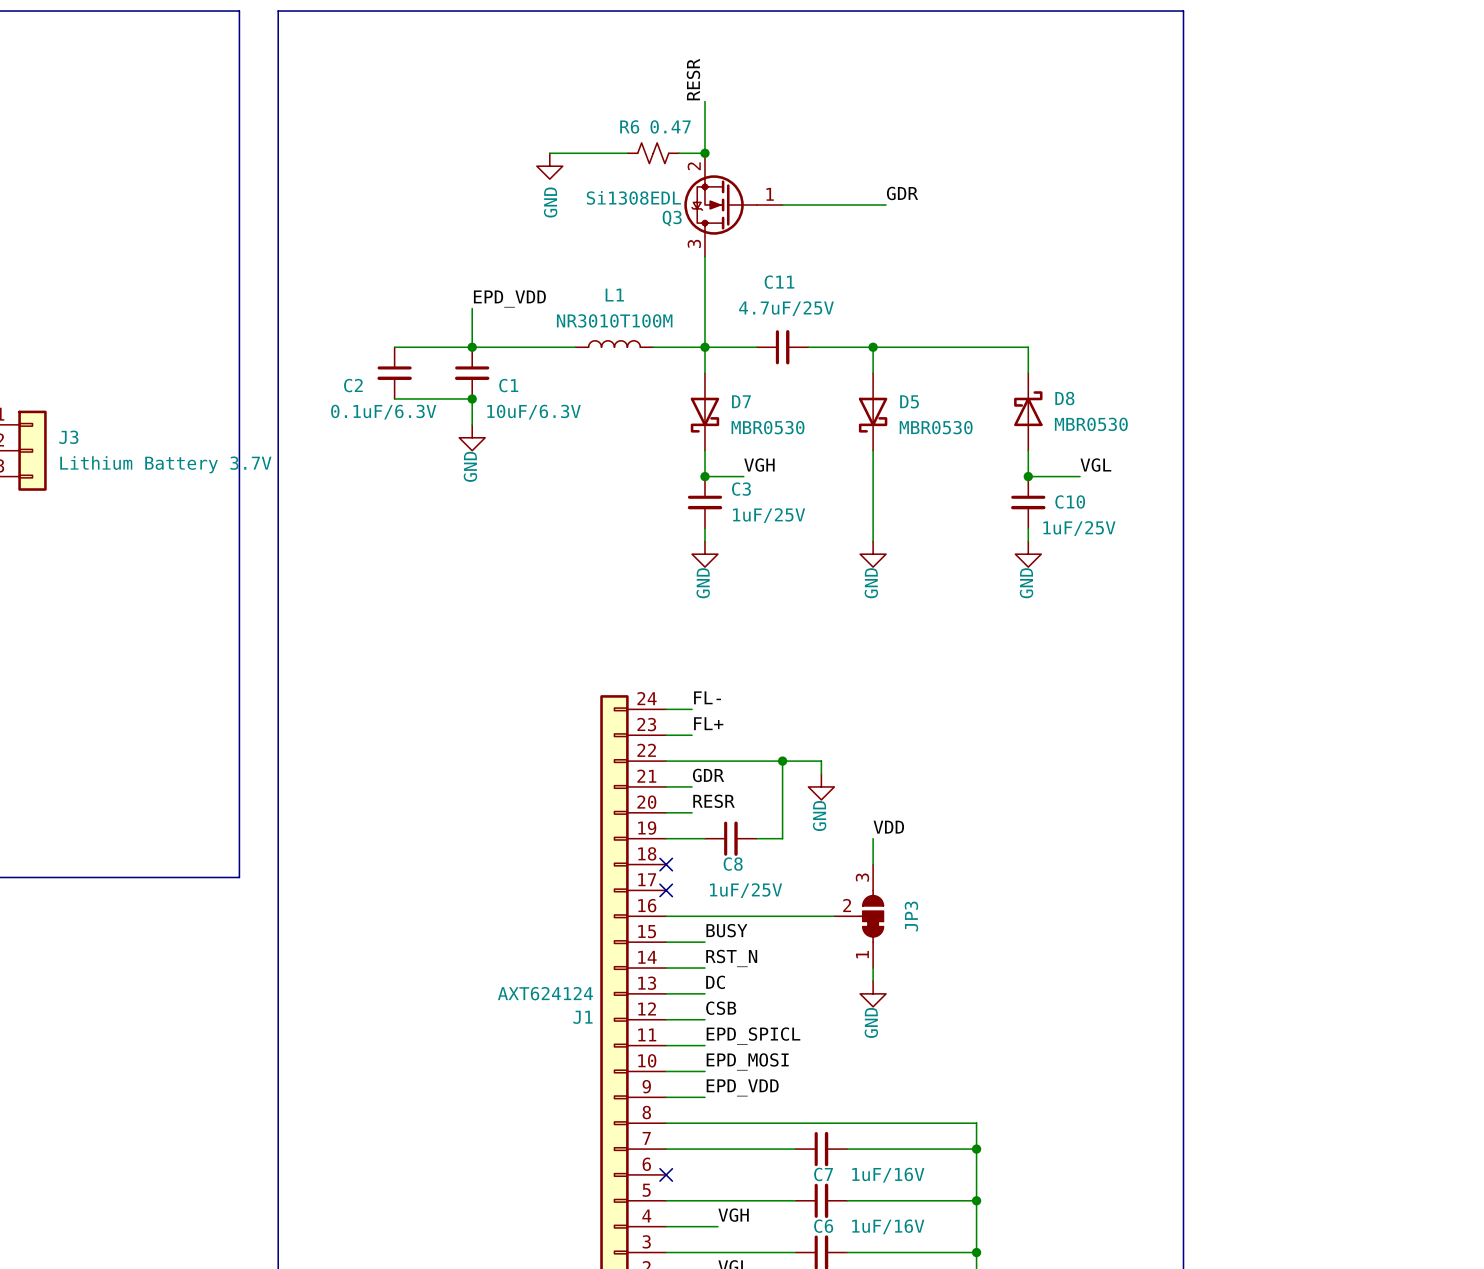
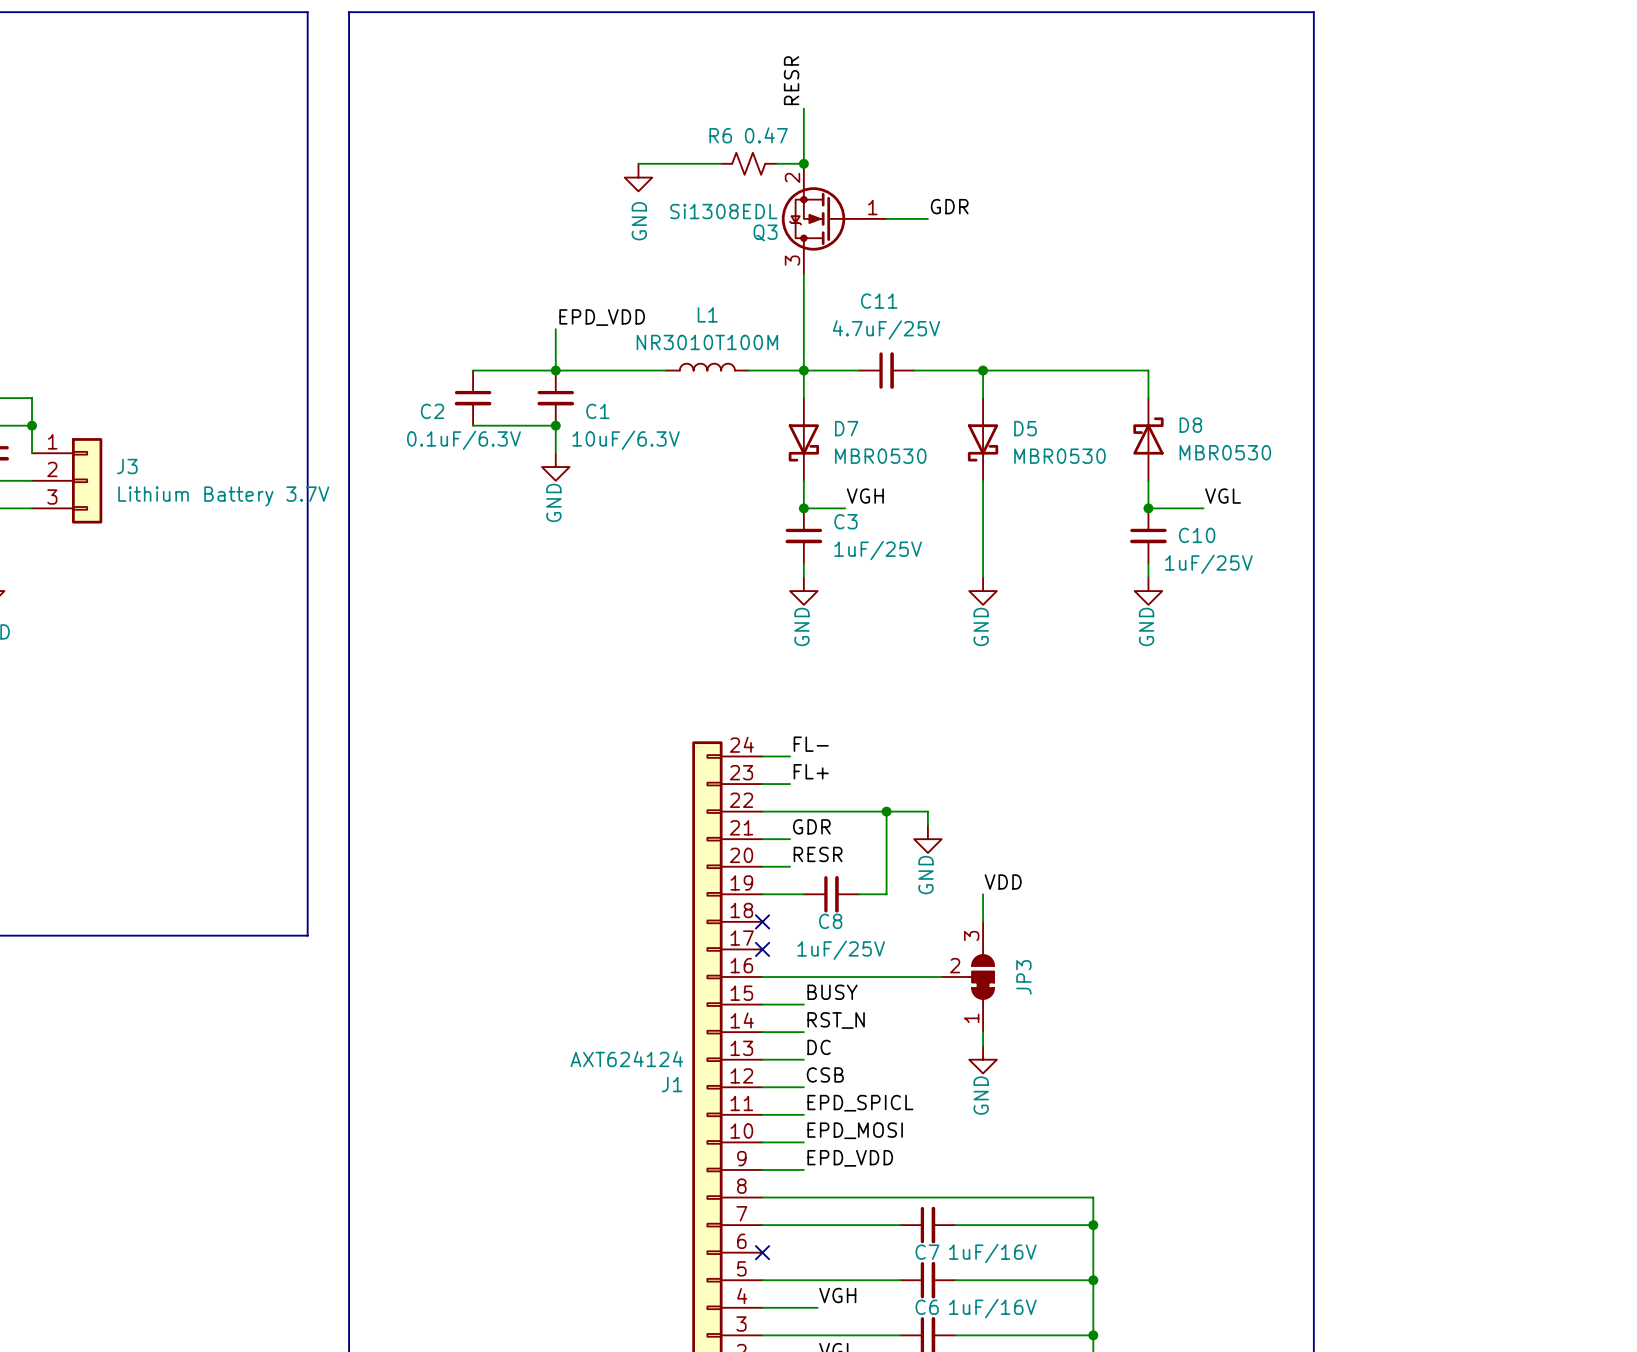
label position: GDR (902, 193) -> GDR (949, 206)
wire: (821, 205) (886, 205) -> none

